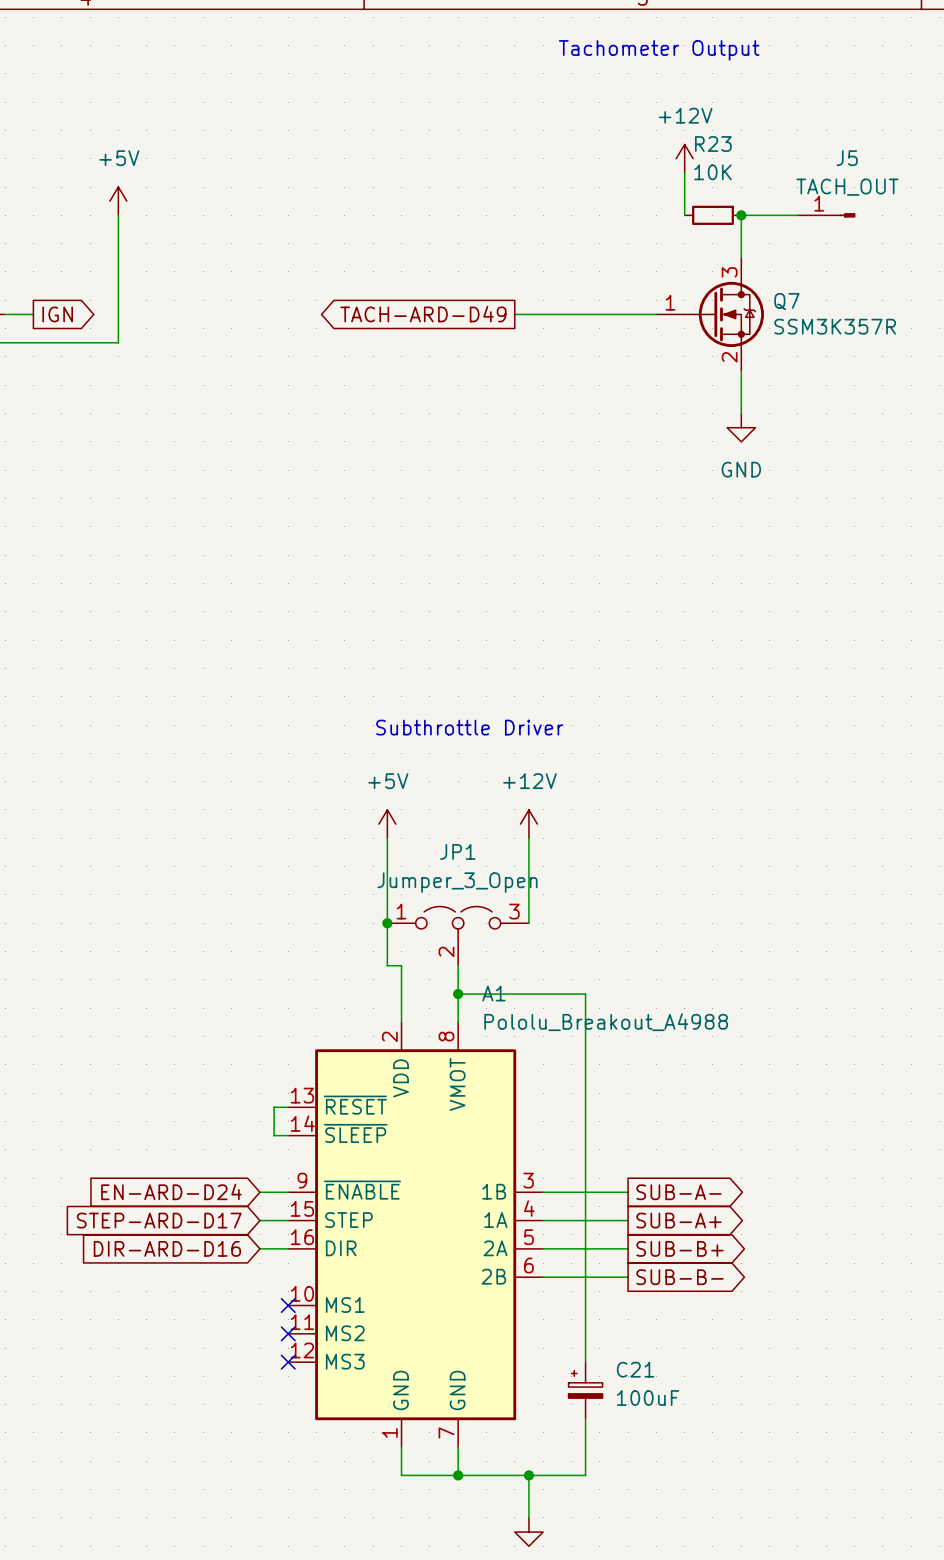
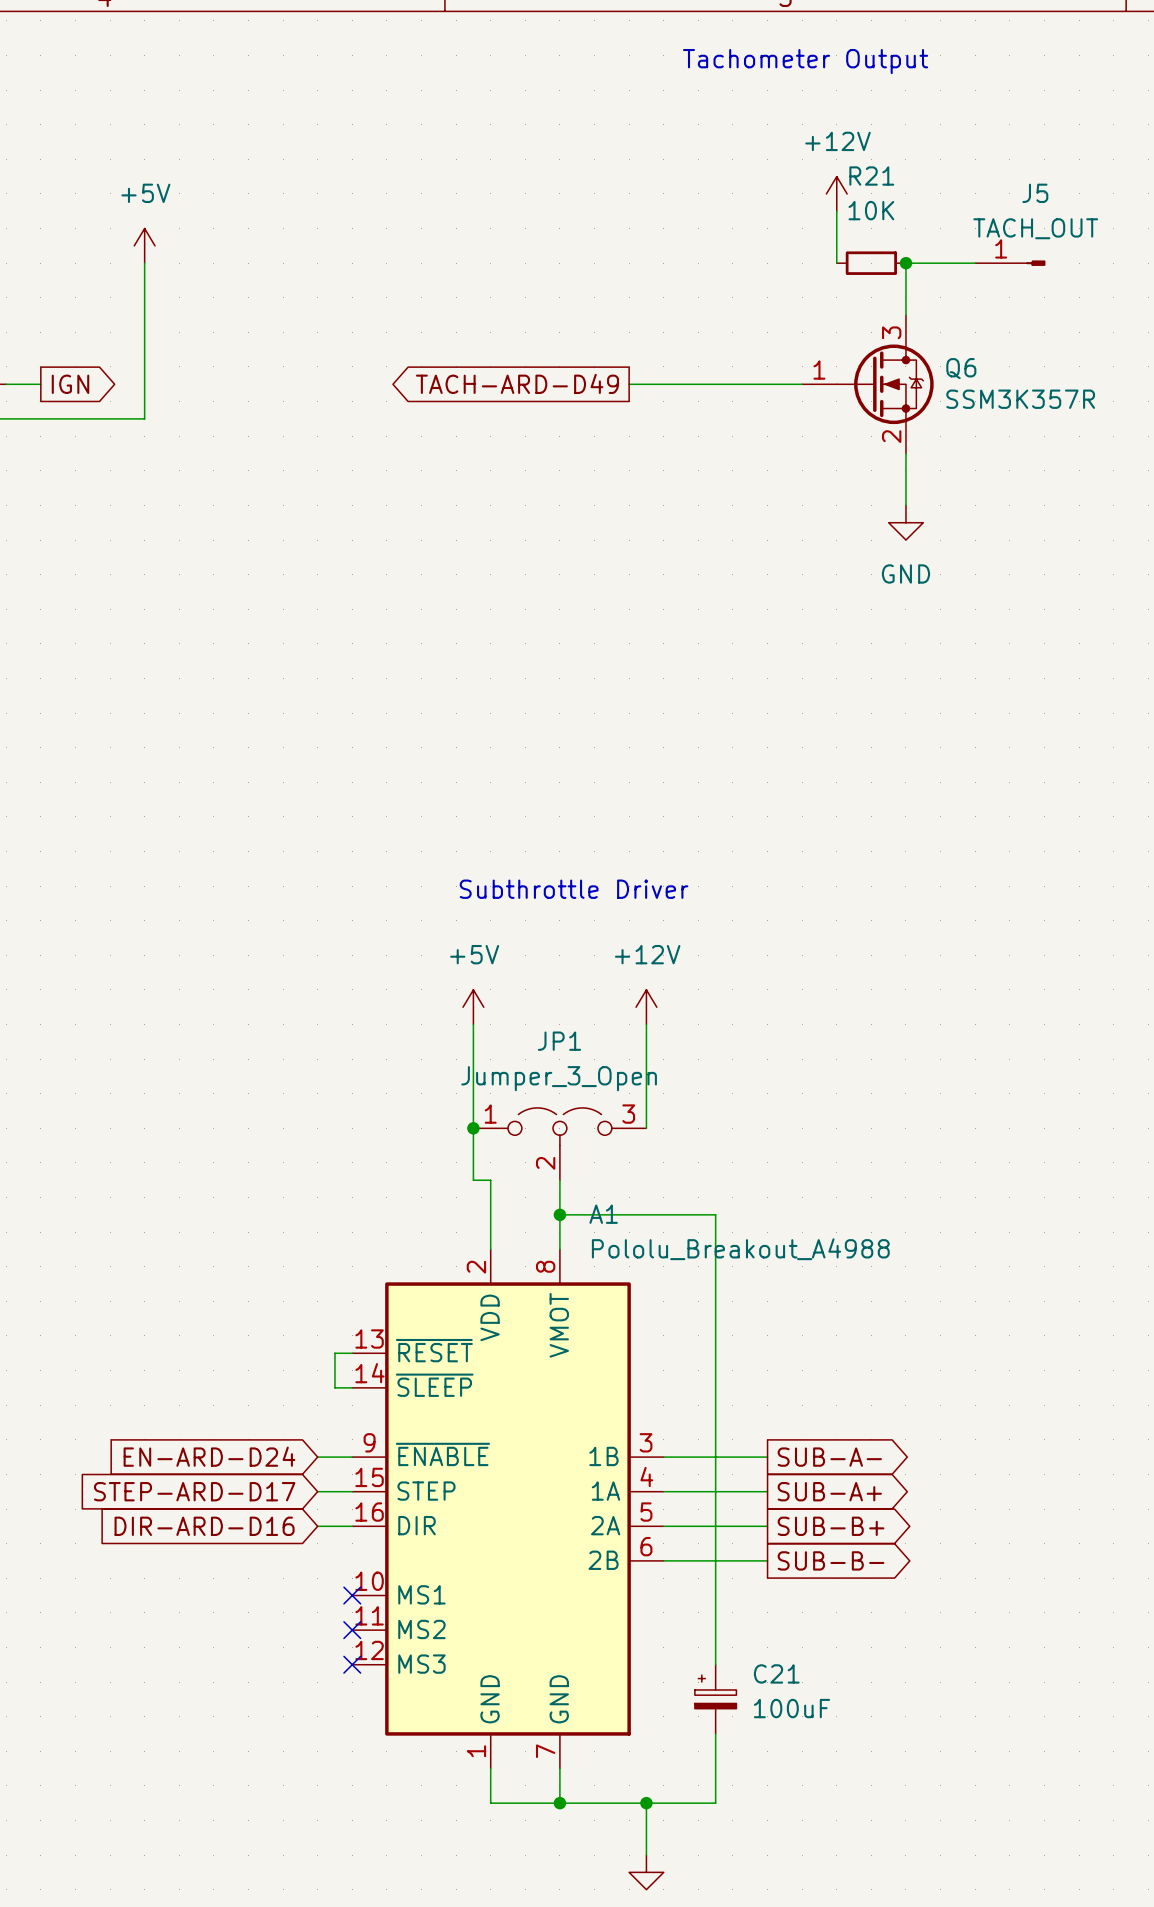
R23 name: R23 (713, 144) -> R21 (871, 176)
Q7 name: Q7 (786, 301) -> Q6 (961, 368)

